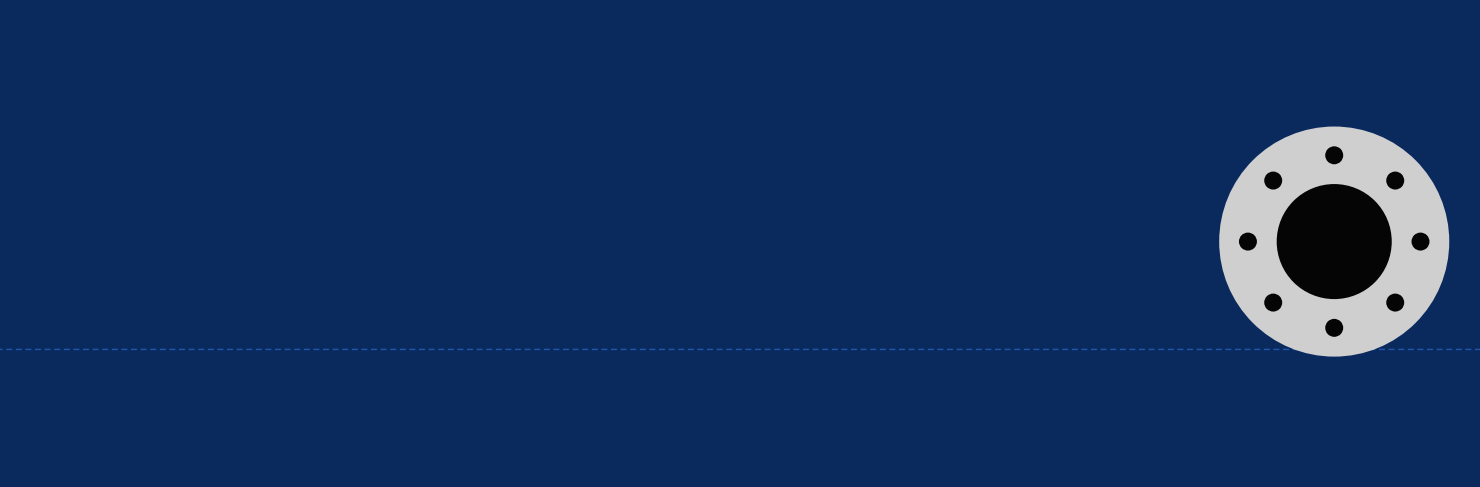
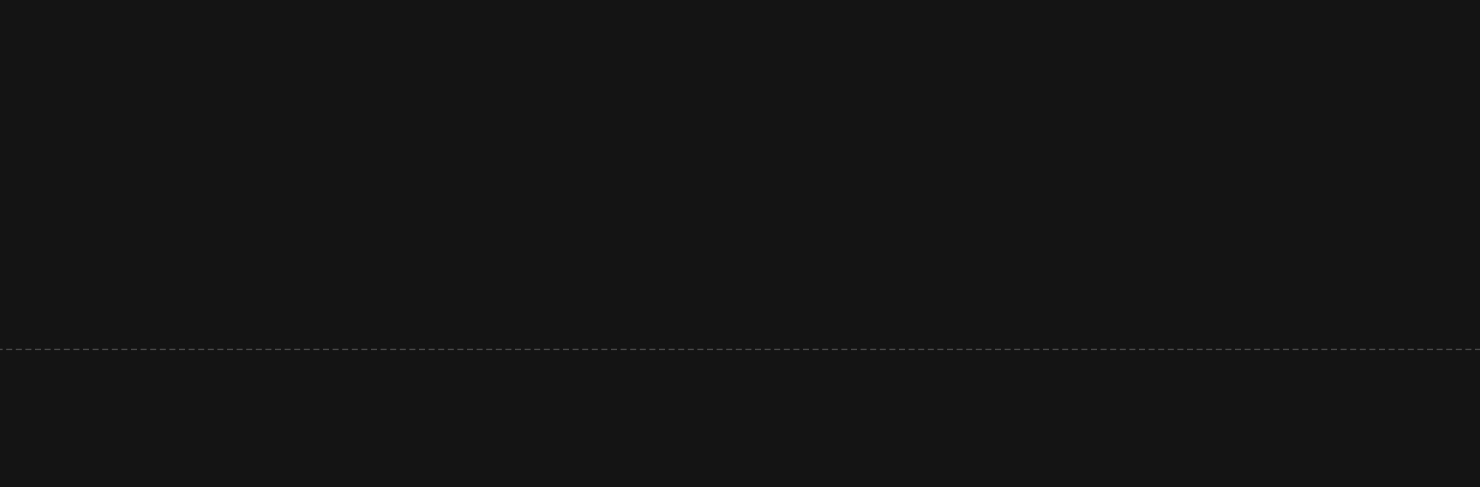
part: (1334, 241) -> none

